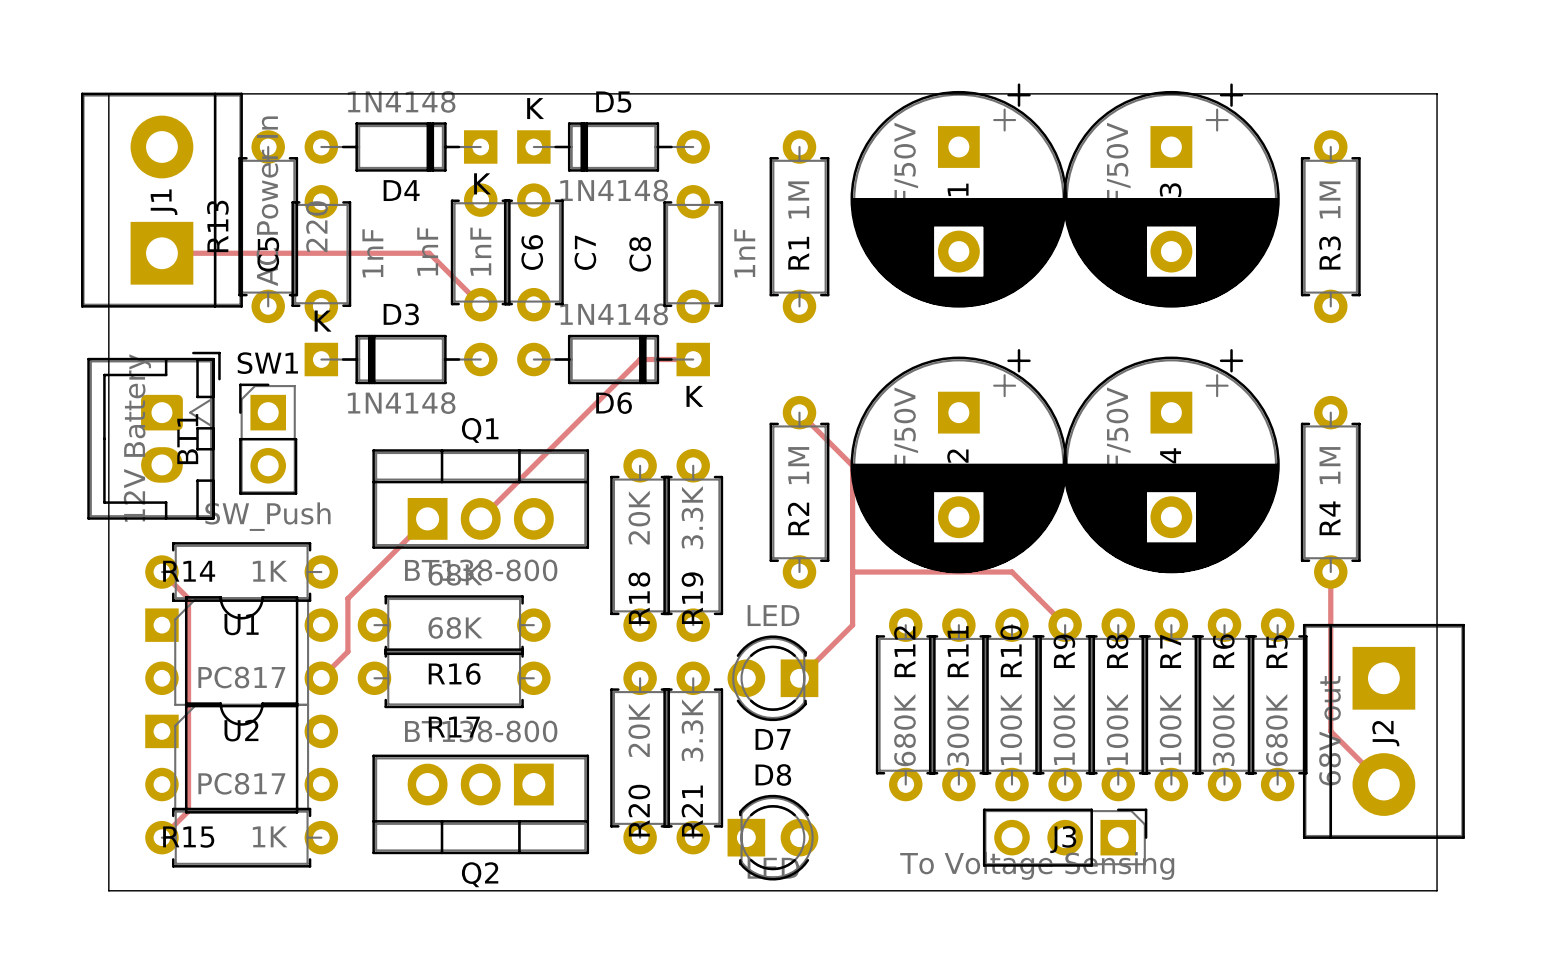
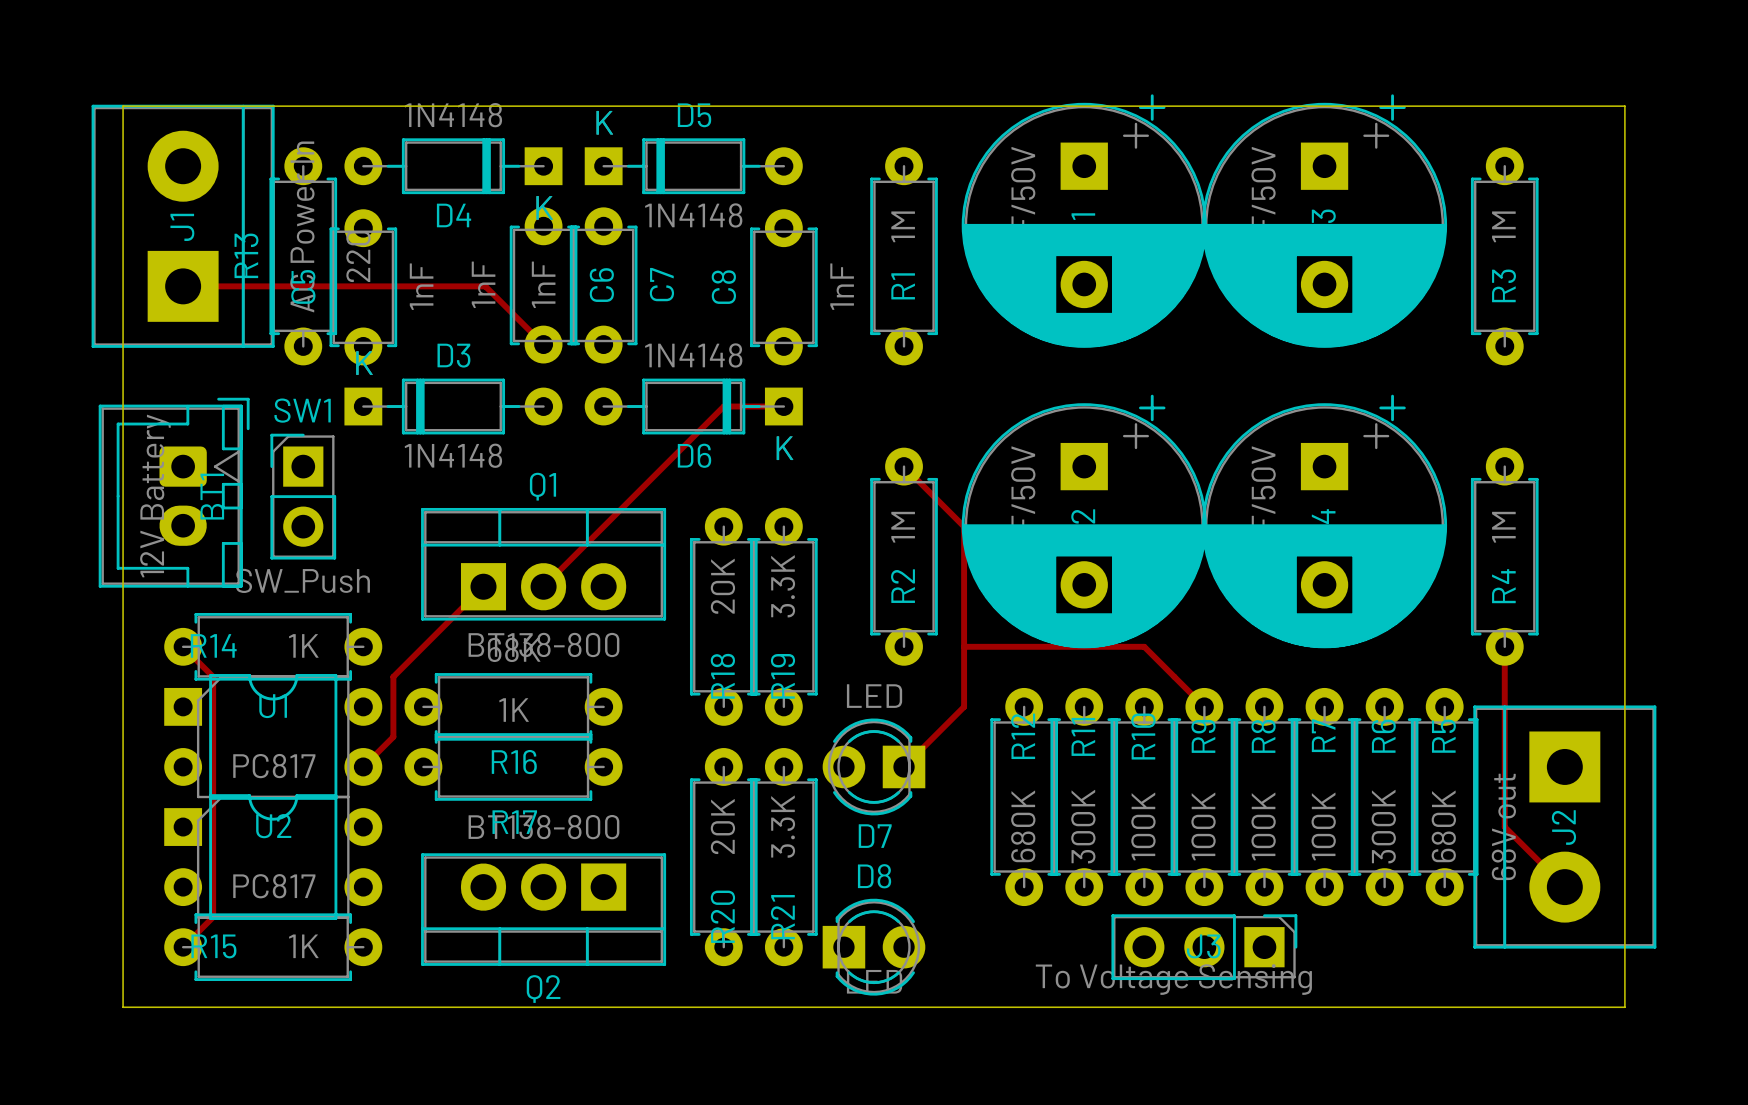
R17 value: 68K (455, 627) -> 1K (514, 710)

